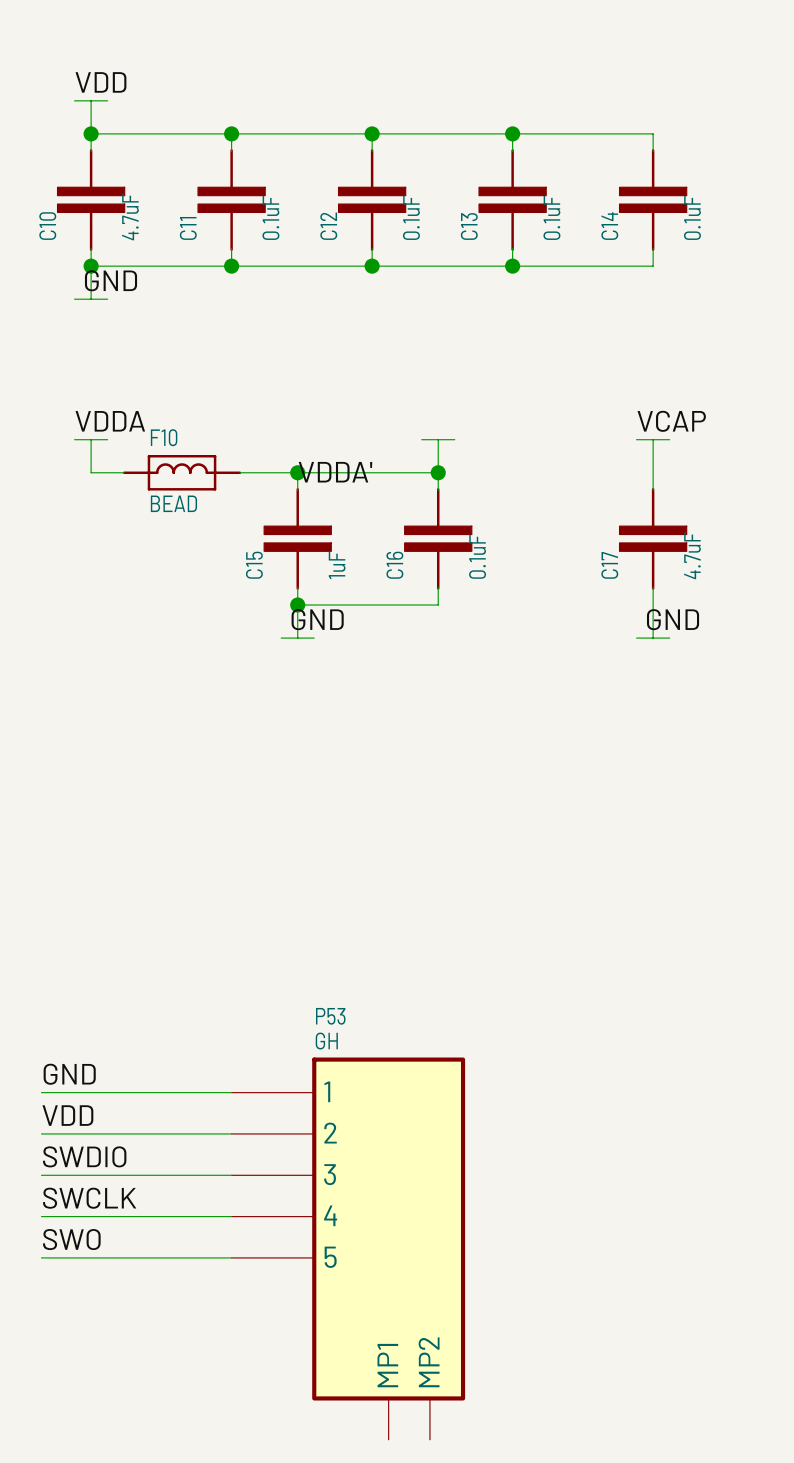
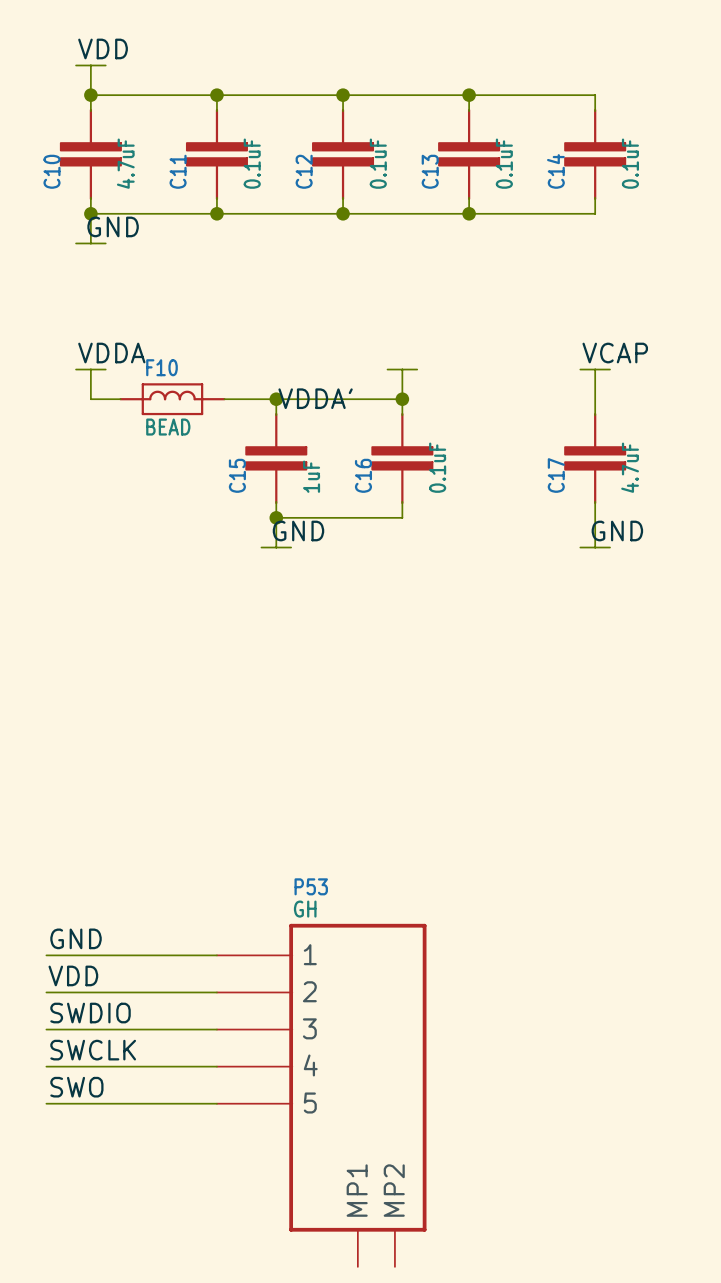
P53 symbol: [231, 1057, 466, 1440] -> [216, 923, 427, 1267]

